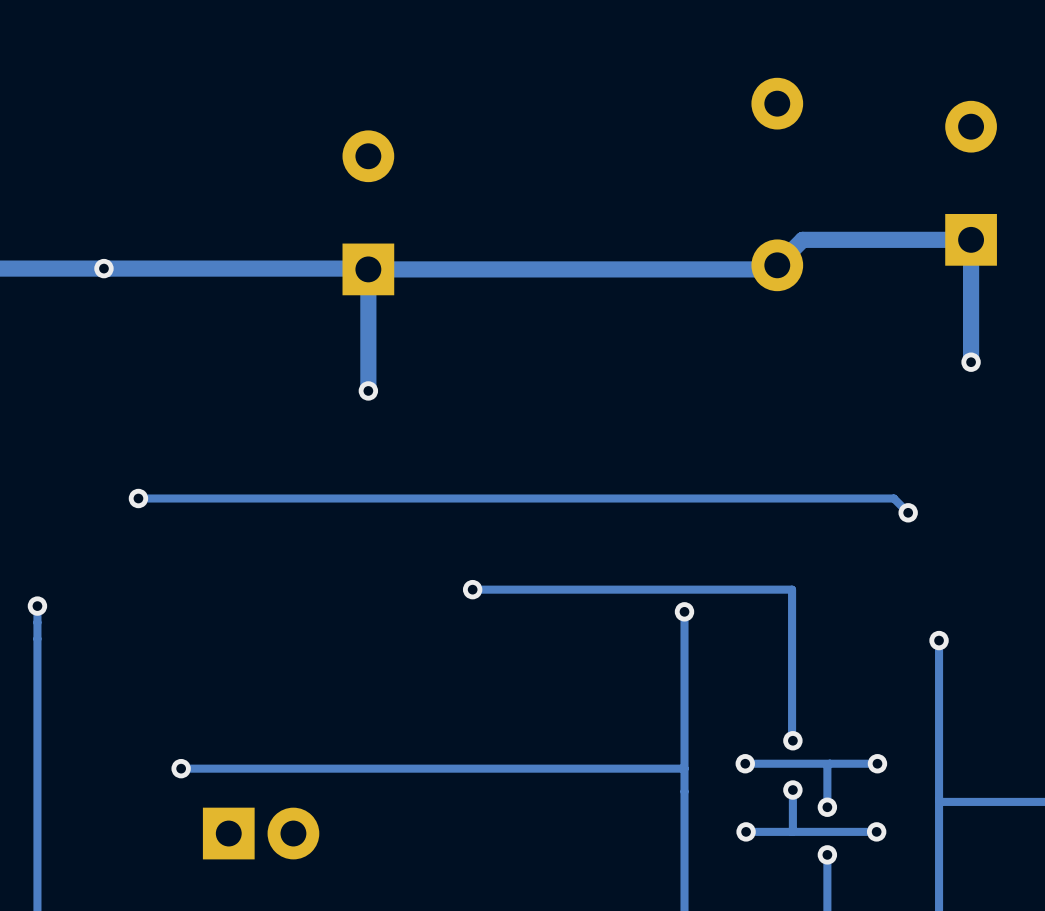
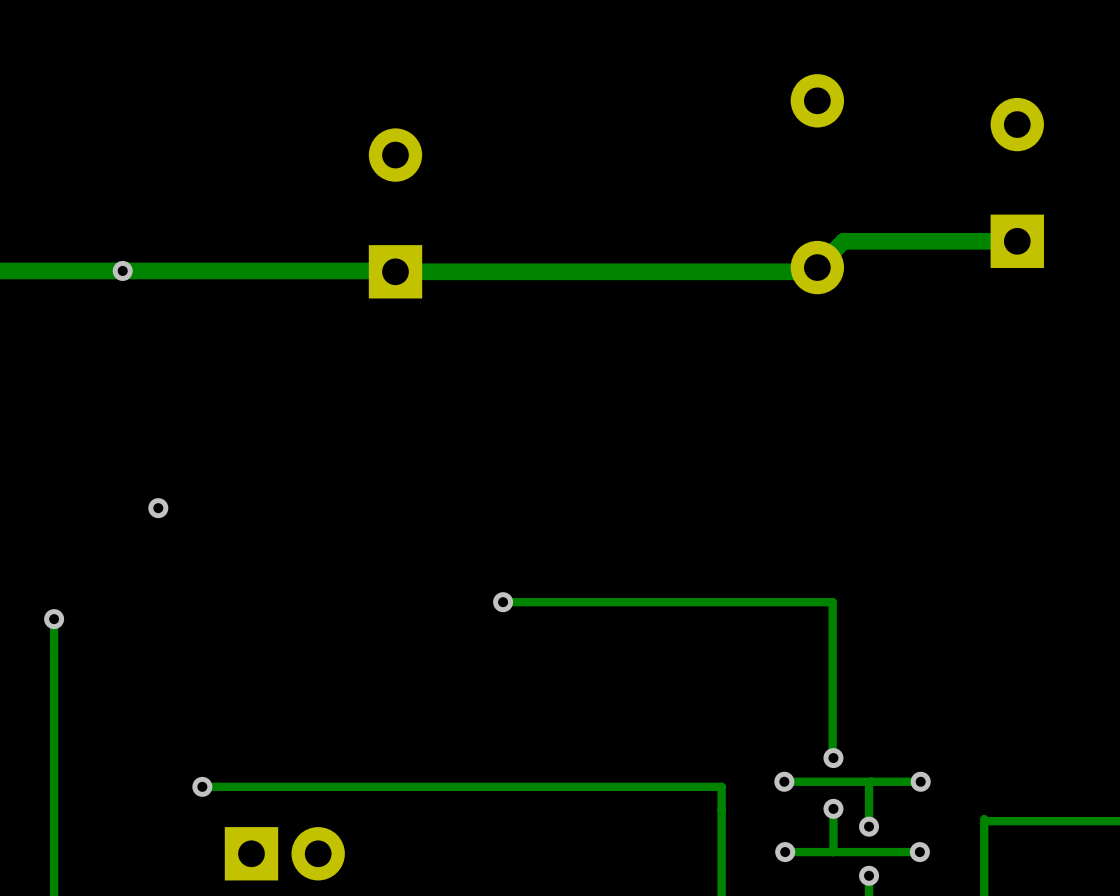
track: (971, 239) (971, 362) -> none
track: (368, 269) (368, 390) -> none
via: (971, 362) -> none
via: (368, 390) -> none
track: (138, 498) (893, 498) (908, 512) -> none
via: (908, 512) -> none
track: (684, 611) (684, 768) -> none
via: (684, 611) -> none
track: (939, 640) (939, 799) (941, 801) -> none
via: (939, 640) -> none

